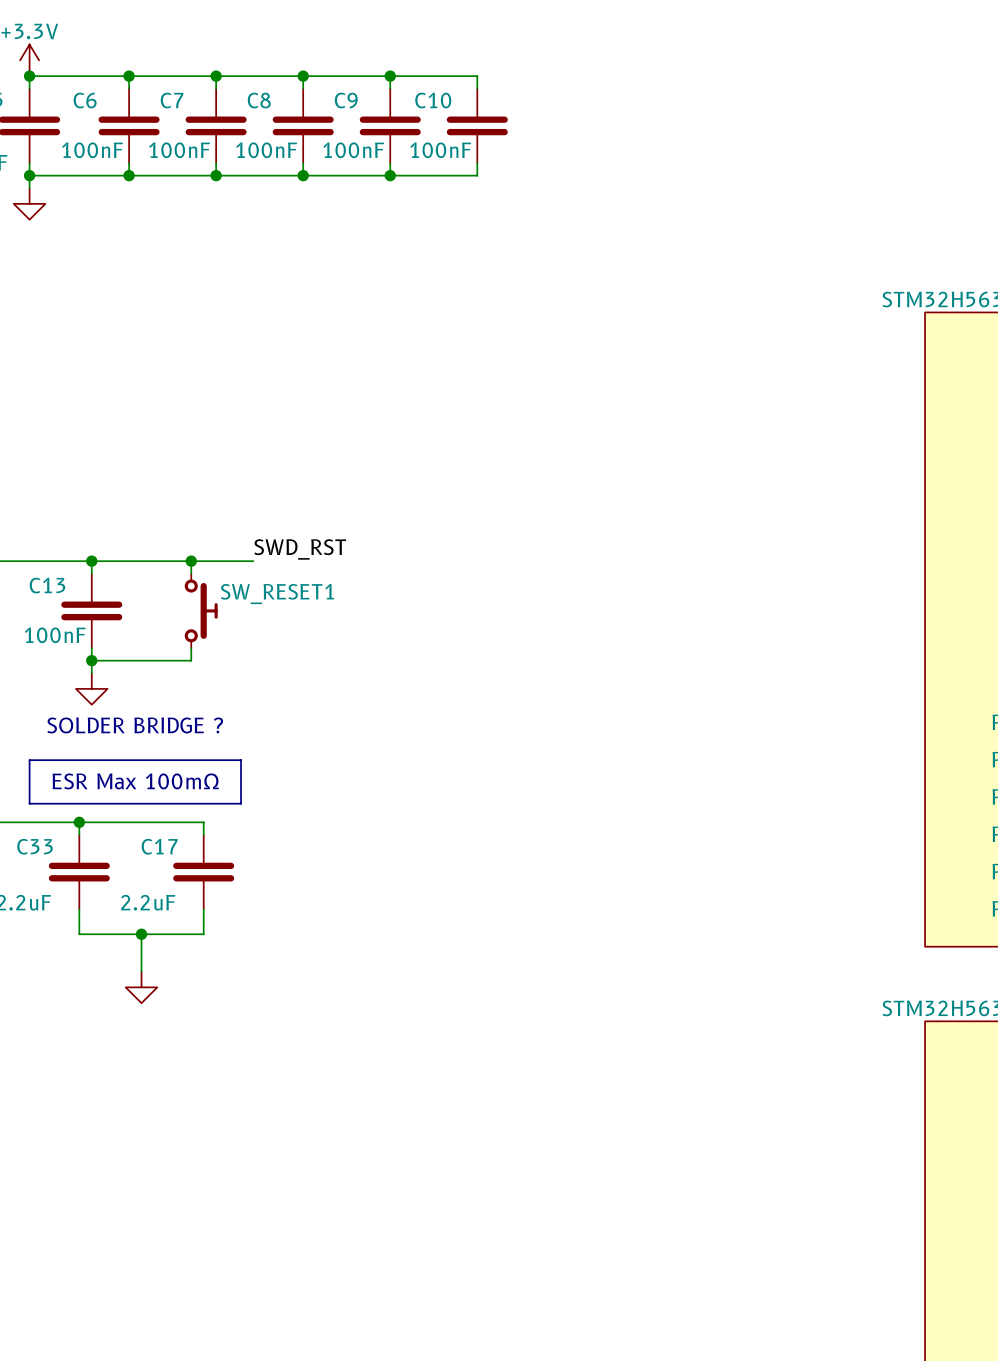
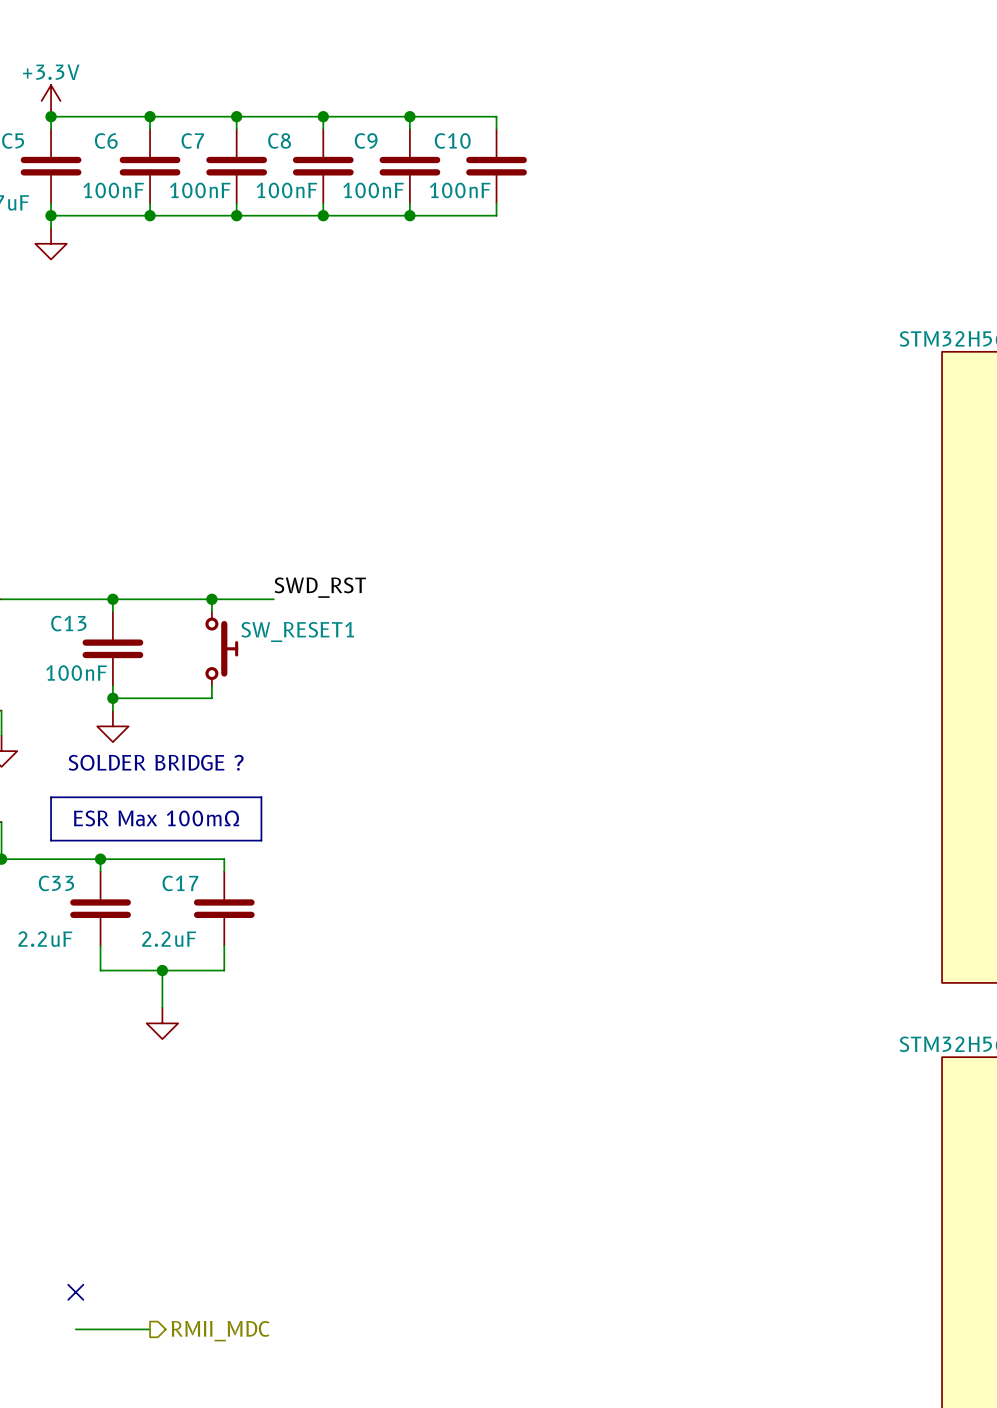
no-connect mark: none -> (75, 1292)
wire: none -> (75, 1329) (150, 1329)
hierarchical label: none -> RMII_MDC (220, 1331)

